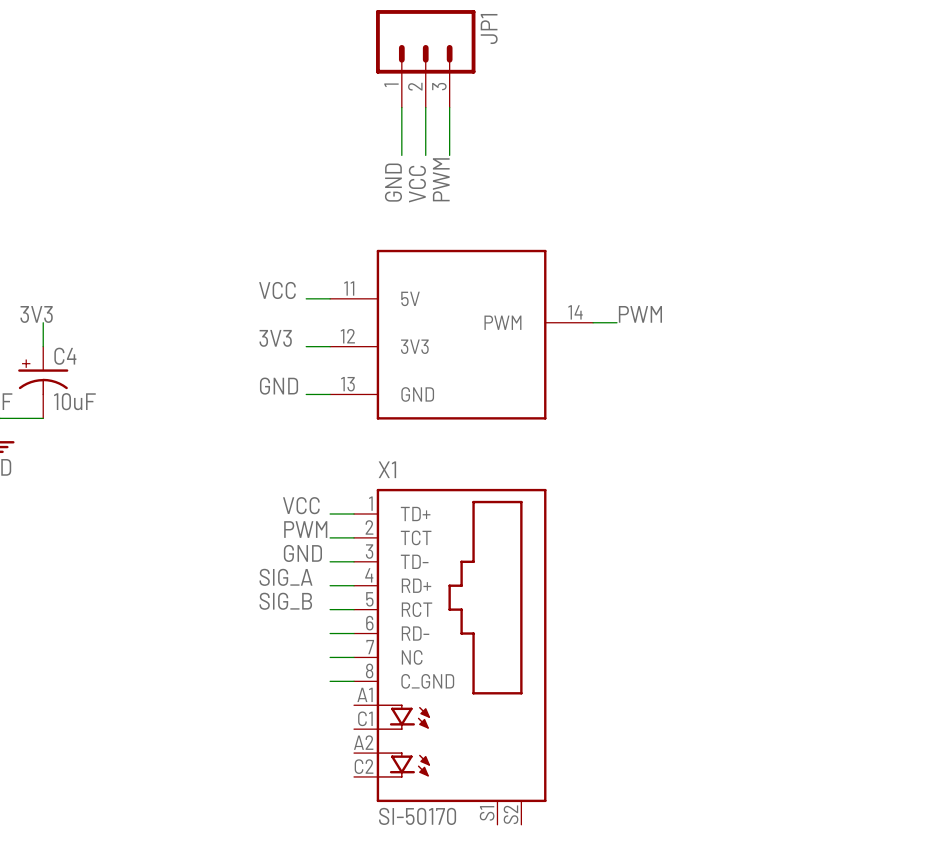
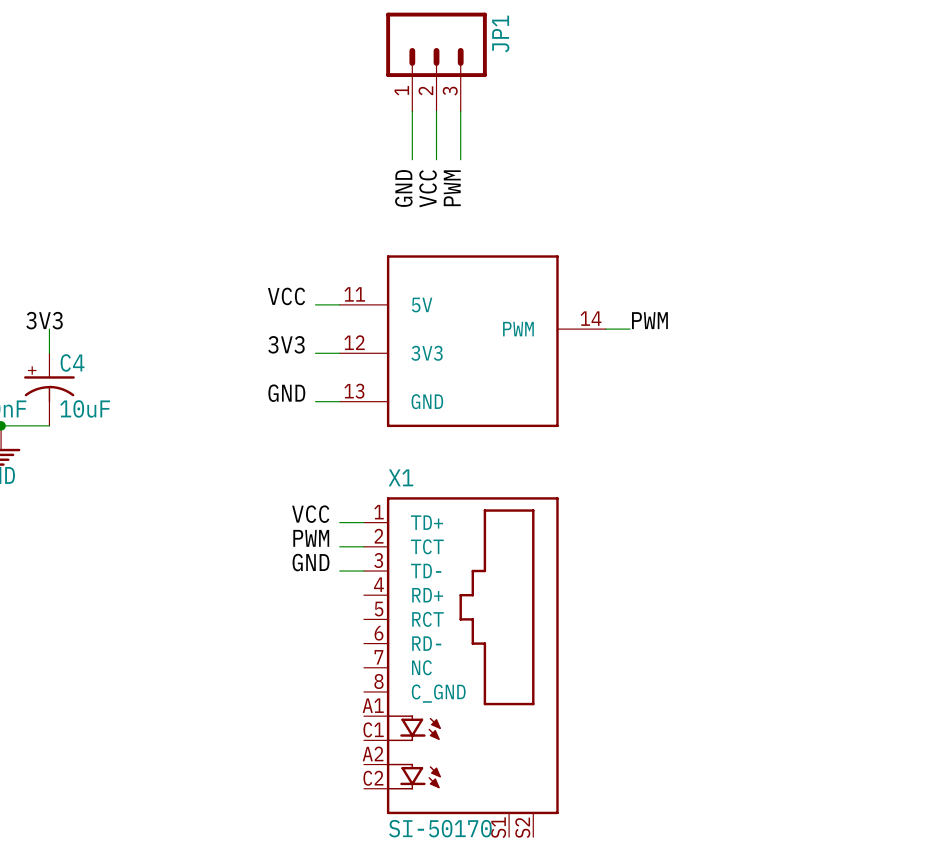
label: SIG_A (285, 577) -> none
wire: (330, 585) (354, 585) -> none
label: SIG_B (285, 601) -> none
wire: (330, 609) (354, 609) -> none
wire: (330, 633) (354, 633) -> none
wire: (330, 657) (354, 657) -> none
wire: (330, 681) (354, 681) -> none

